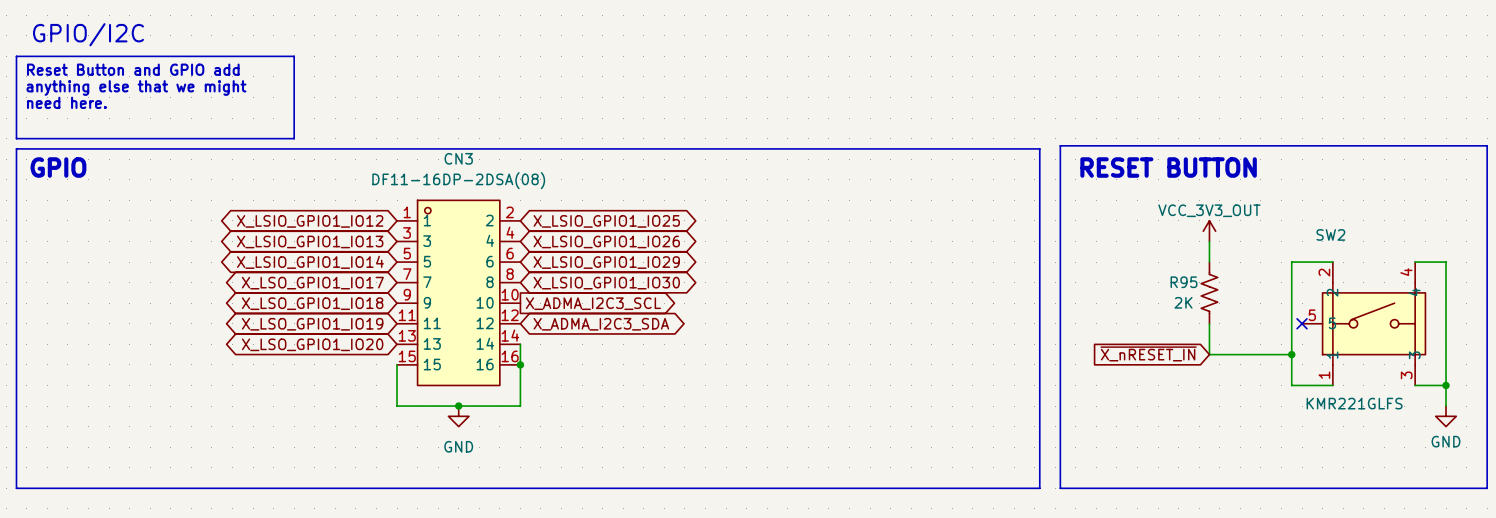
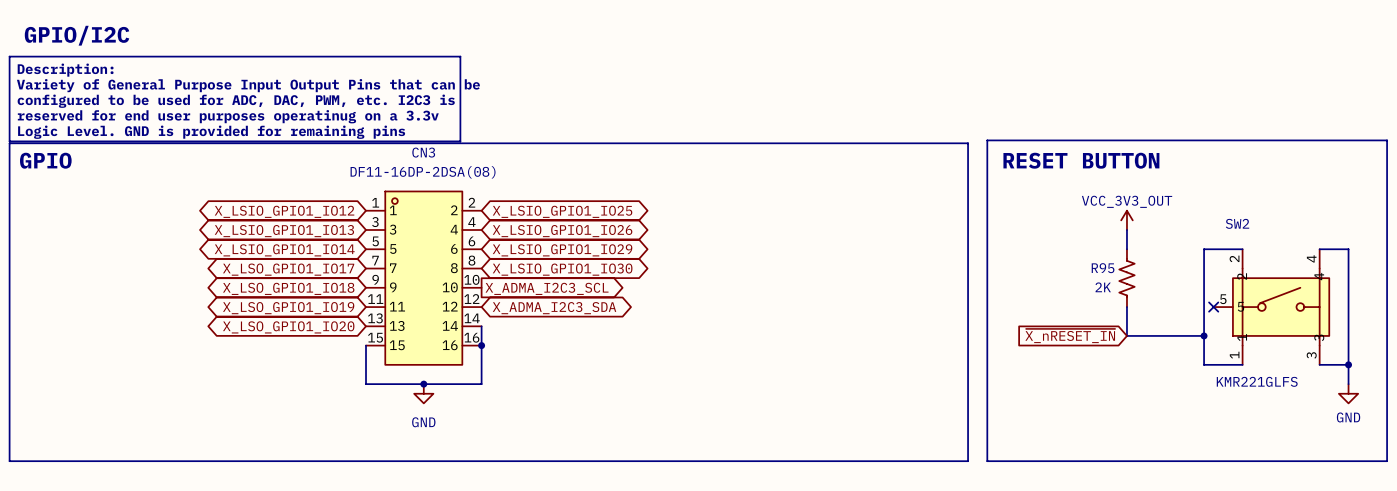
line: (294, 56) (294, 138) (16, 138) -> (269, 56) (460, 56) (460, 141) (9, 141) (9, 133)
text: Reset Button and GPIO add (133, 69) -> Description: (65, 70)
text: anything else that we might (136, 87) -> Variety of General Purpose Input Output Pins that can be (248, 85)
text: need here. (66, 102) -> configured to be used for ADC, DAC, PWM, etc. I2C3 is (236, 101)
text: none -> reserved for end user purposes operatinug on a 3.3v (228, 116)
text: none -> Logic Level. GND is provided for remaining pins (211, 132)

